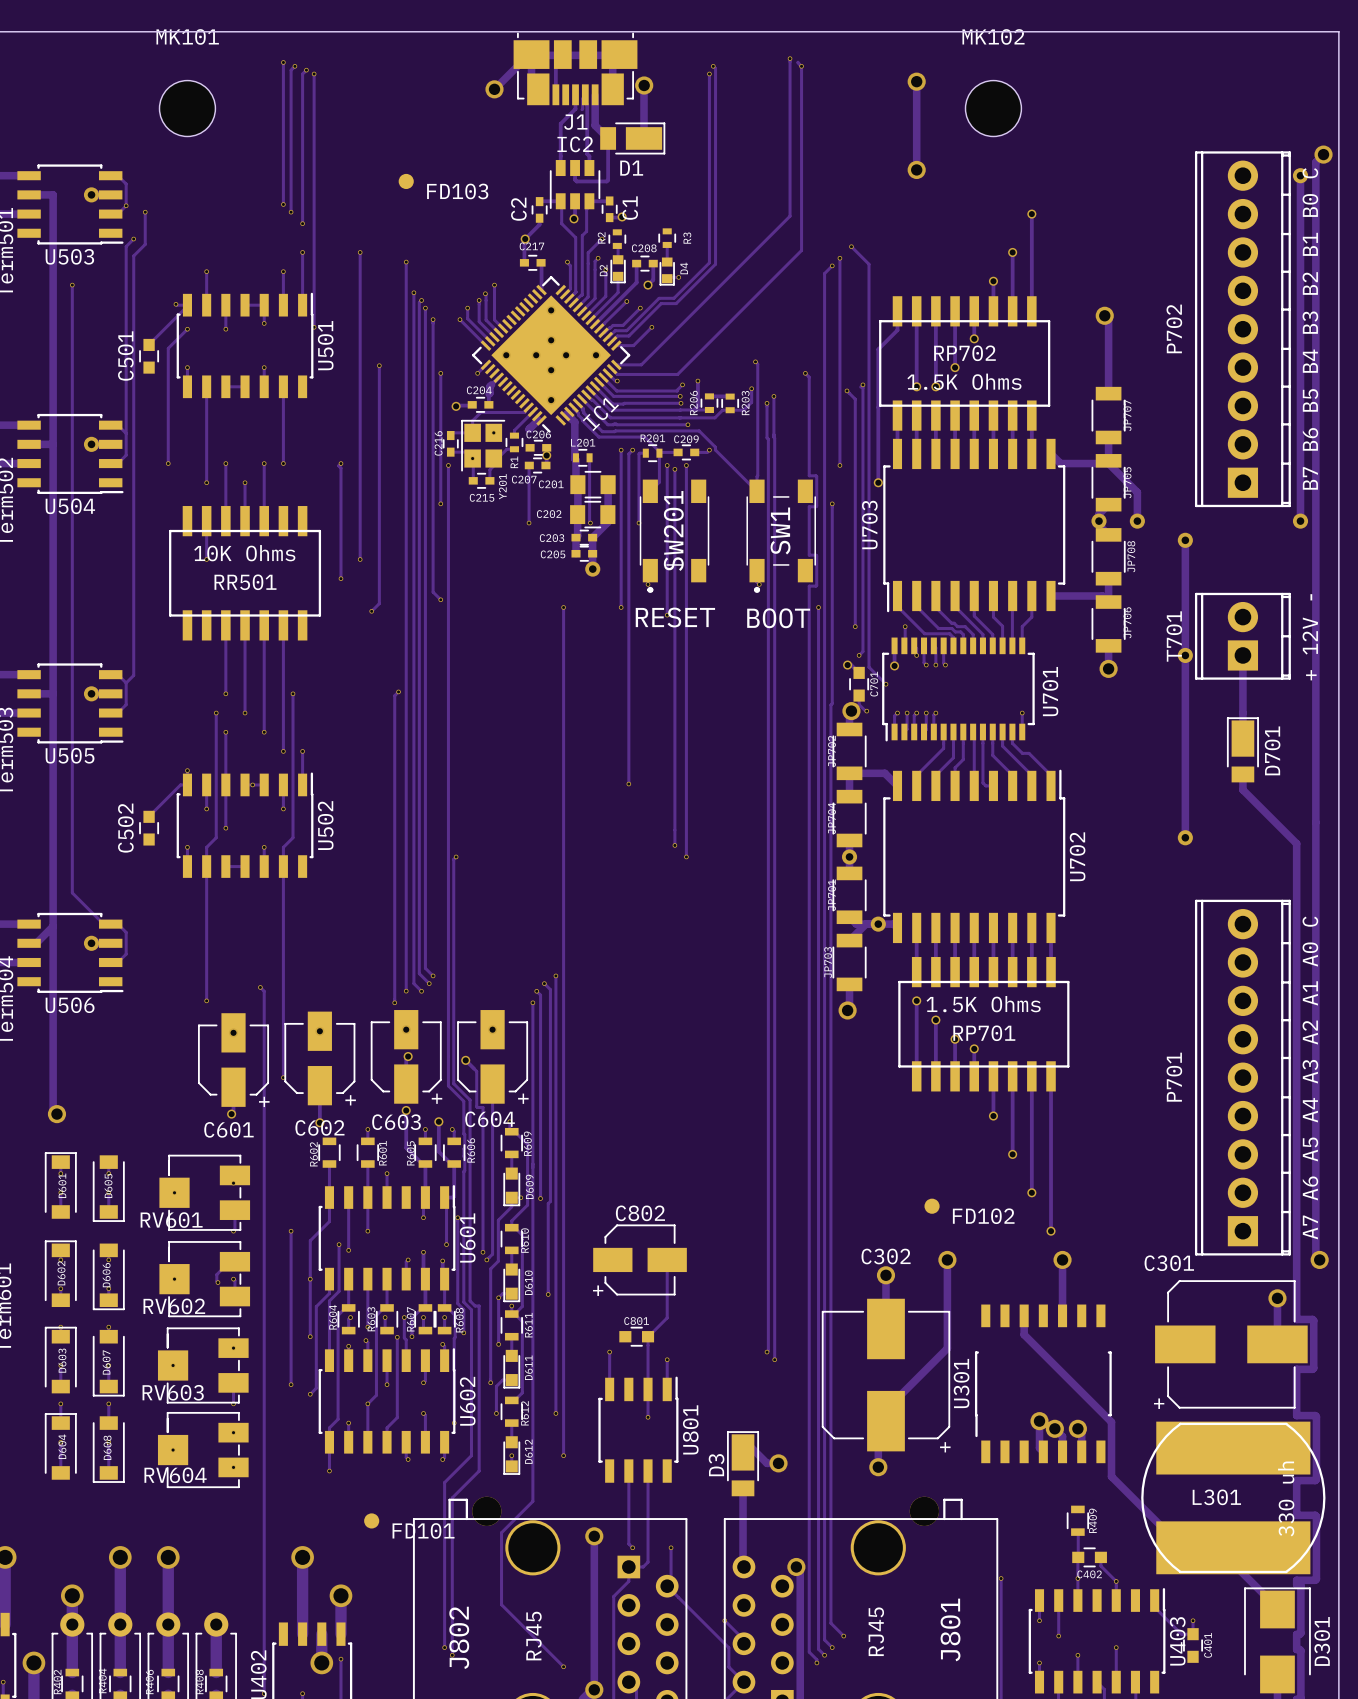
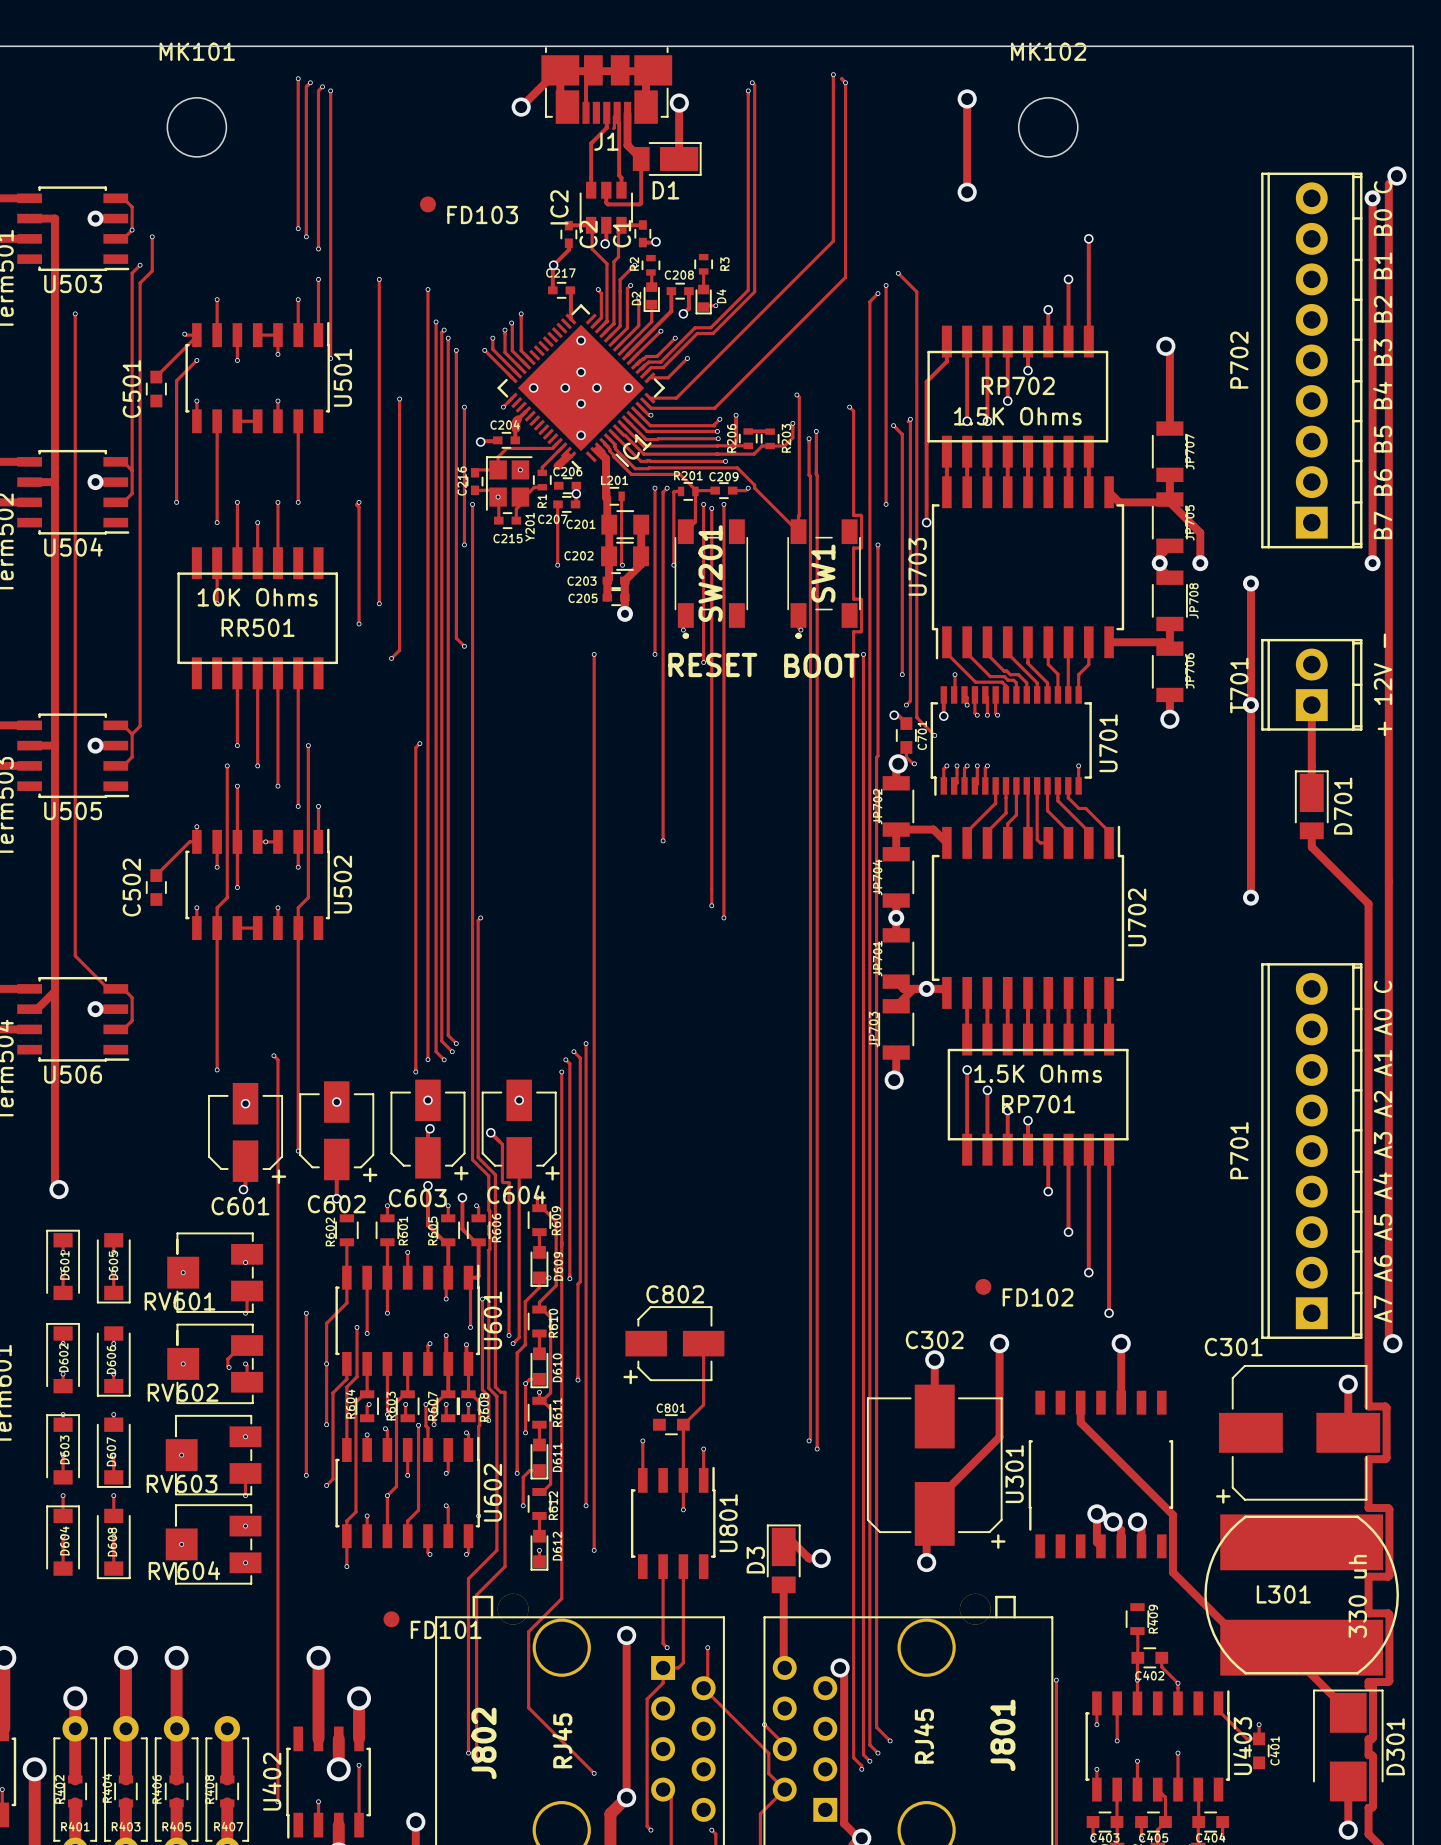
IC2 name rotation: 0° (575, 144) -> 90° counterclockwise (559, 207)
IC2 name position: IC2 (575, 144) -> IC2 (559, 207)
C1 name position: C1 (630, 208) -> C1 (621, 233)
C2 name position: C2 (518, 209) -> C2 (588, 234)

